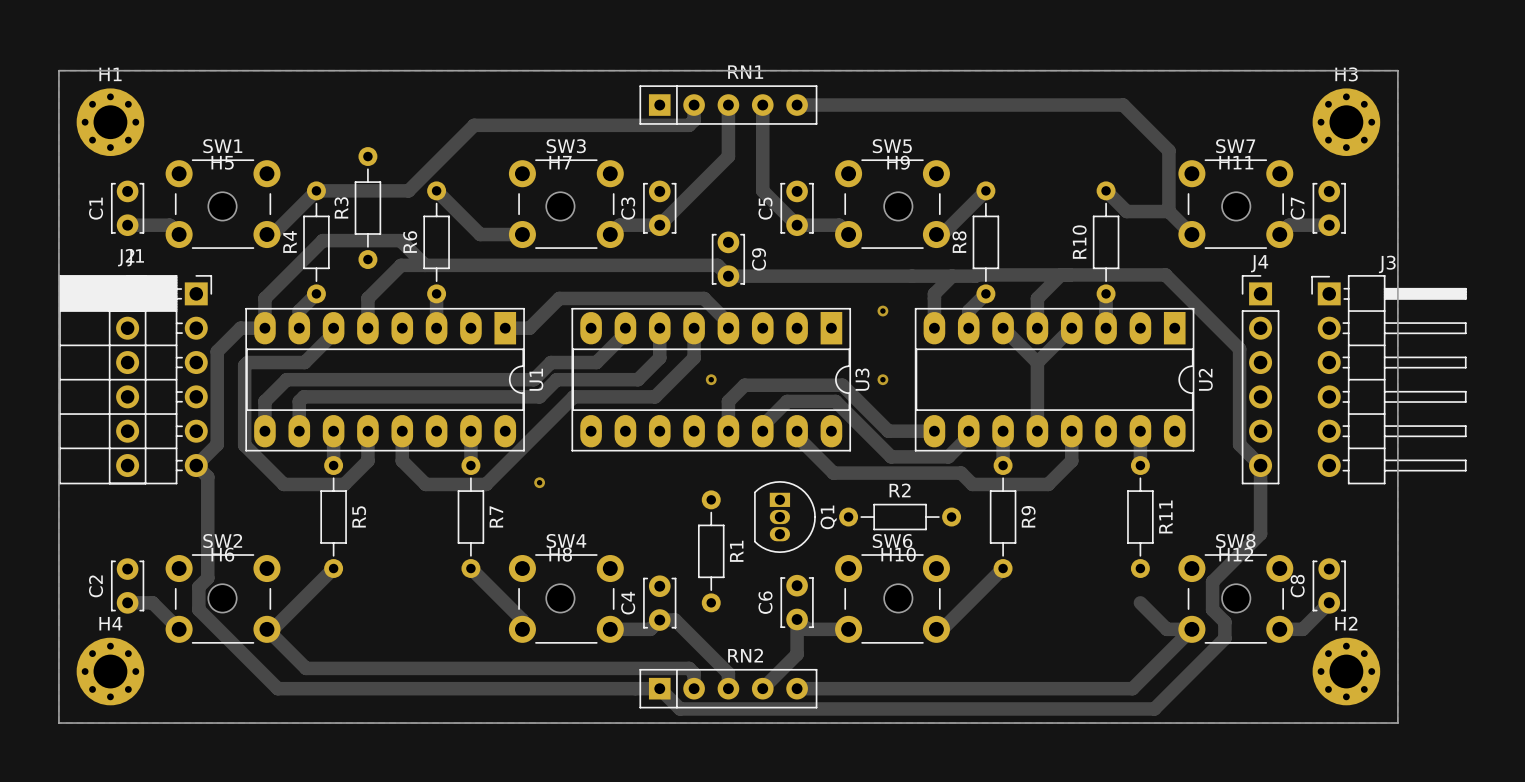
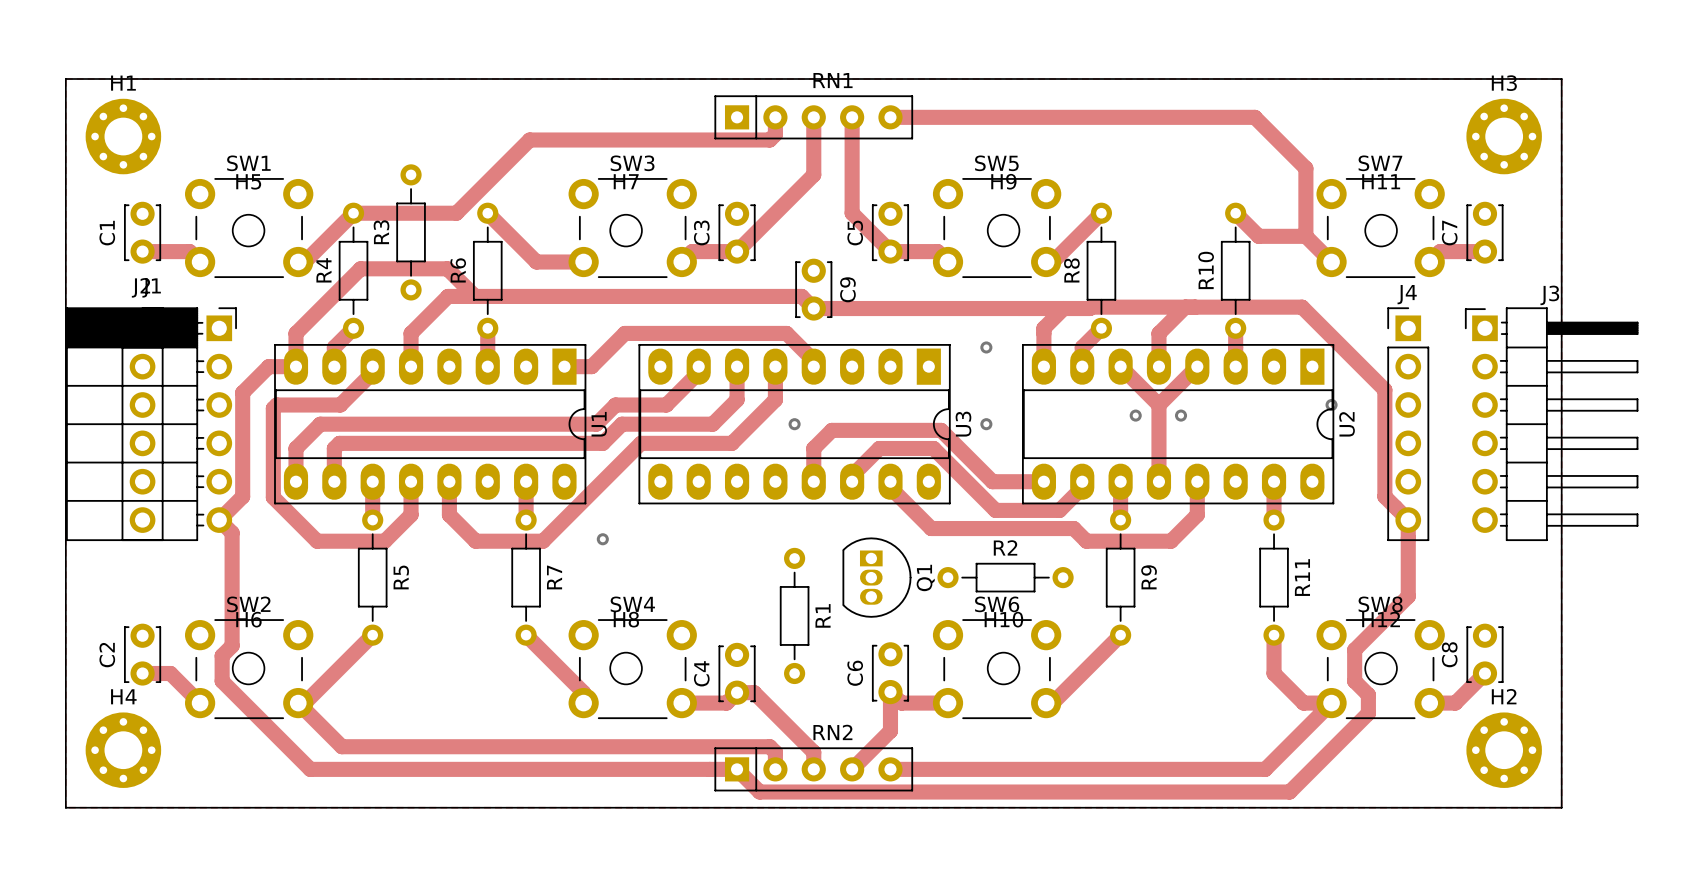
via: none -> (1331, 405)
via: none -> (1135, 415)
via: none -> (1181, 415)
track: none -> (1274, 635) (1274, 673)

